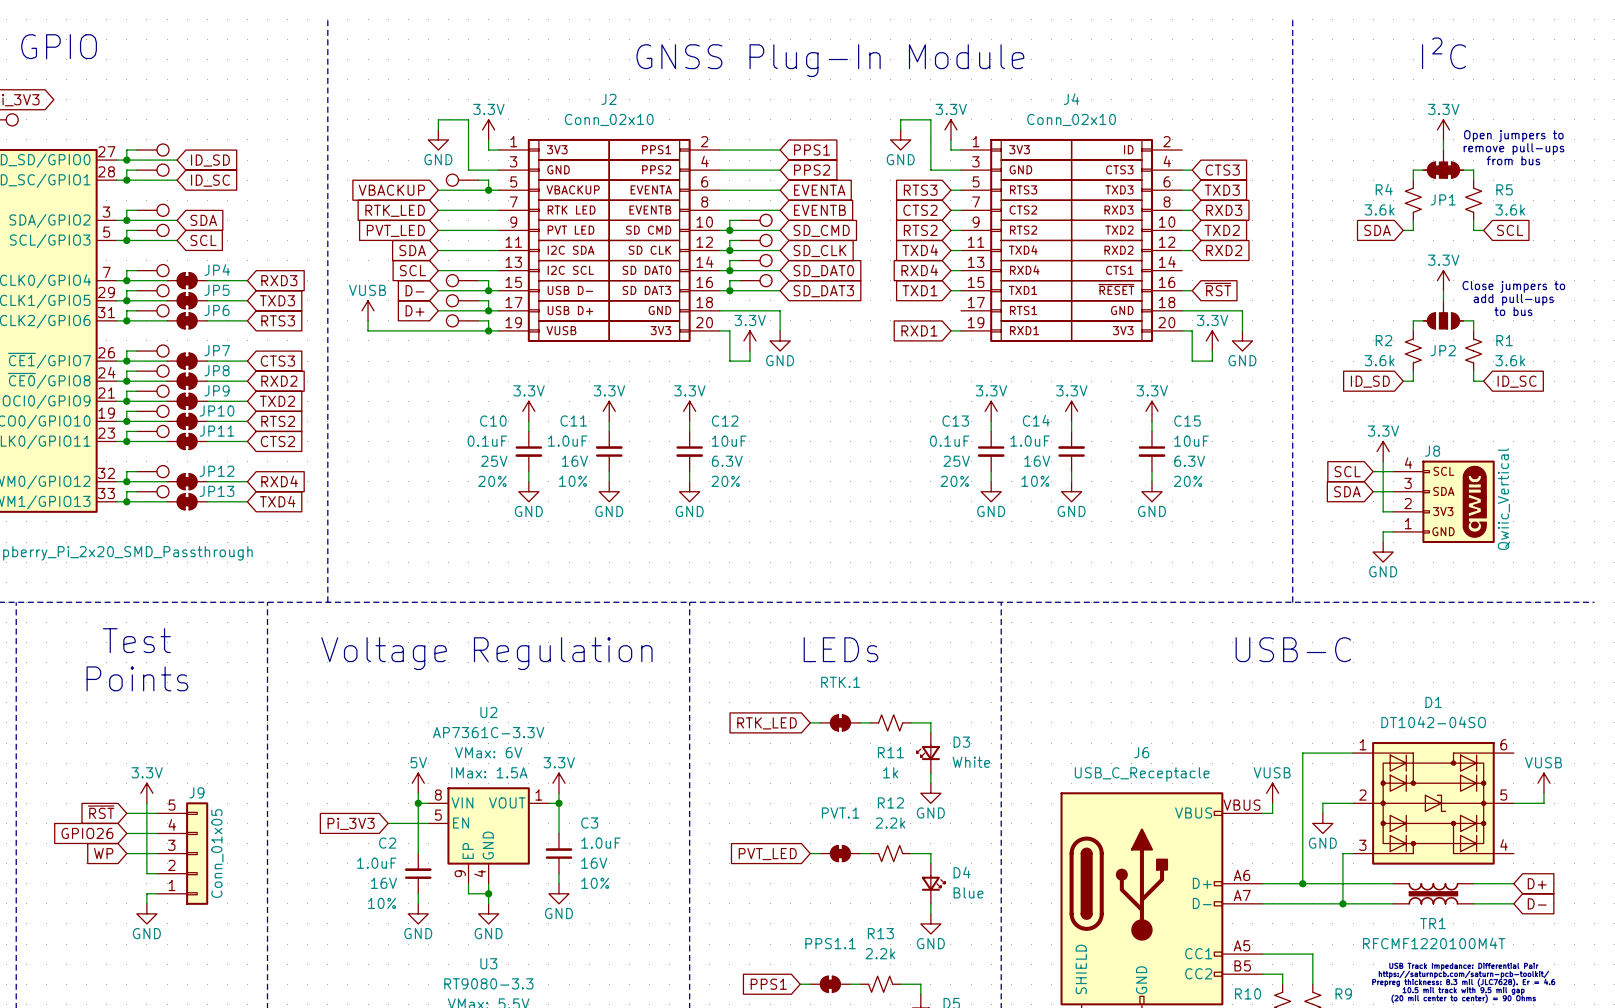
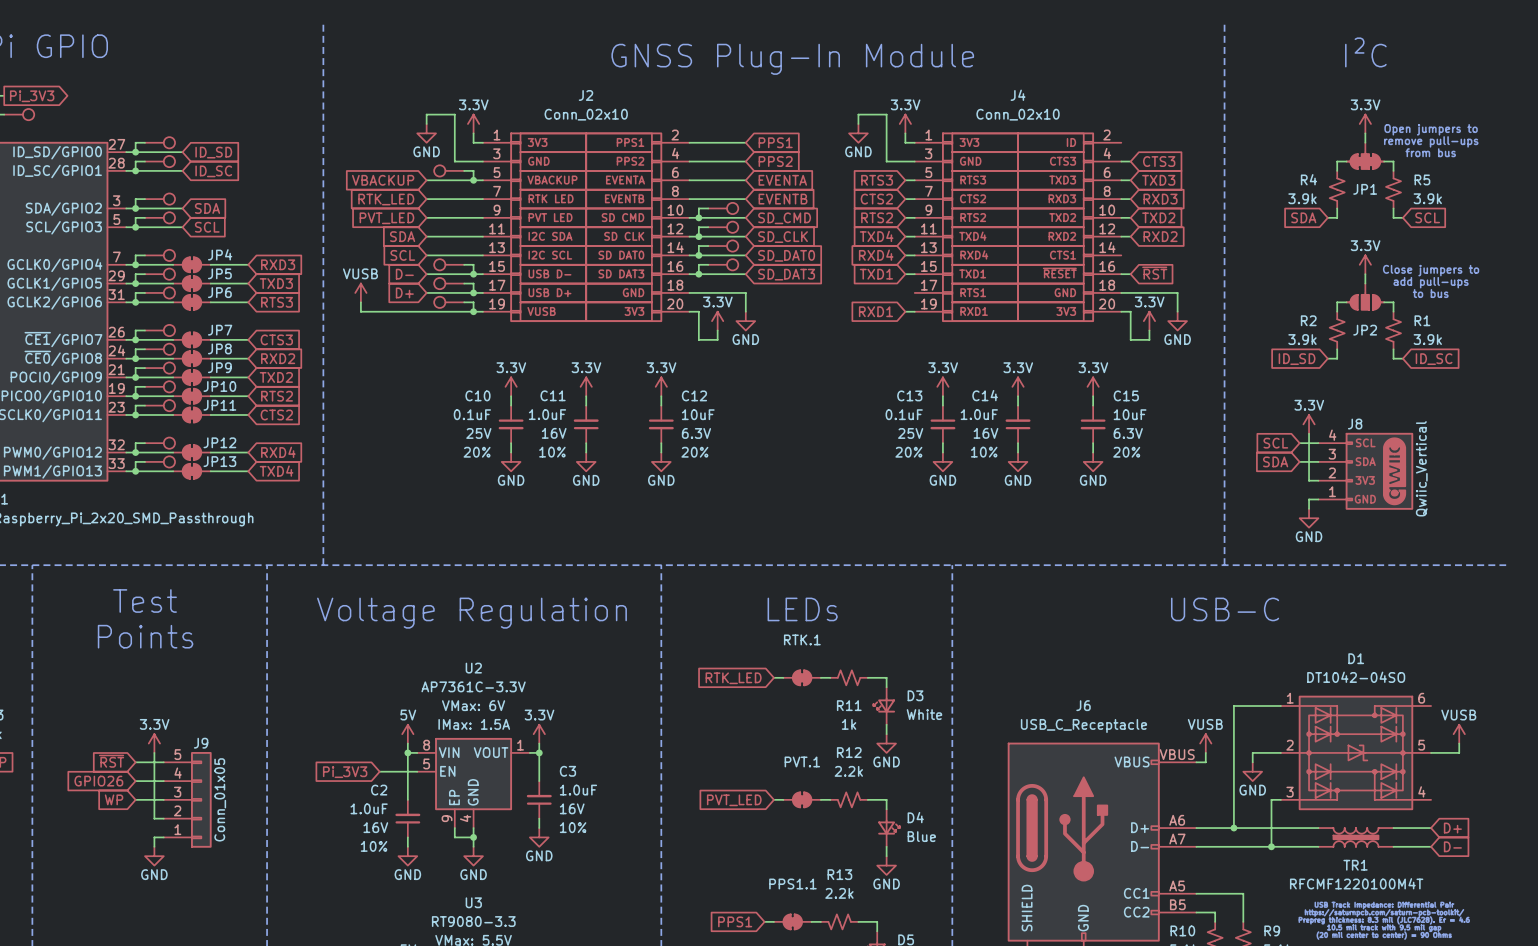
R4 flip: as is (1413, 200) -> left-right (1337, 189)
R4 value: 3.6k (1379, 209) -> 3.9k (1302, 198)
R5 value: 3.6k (1510, 209) -> 3.9k (1427, 198)
R2 flip: as is (1413, 351) -> left-right (1337, 330)
R2 value: 3.6k (1379, 360) -> 3.9k (1302, 339)
R1 value: 3.6k (1510, 360) -> 3.9k (1427, 339)

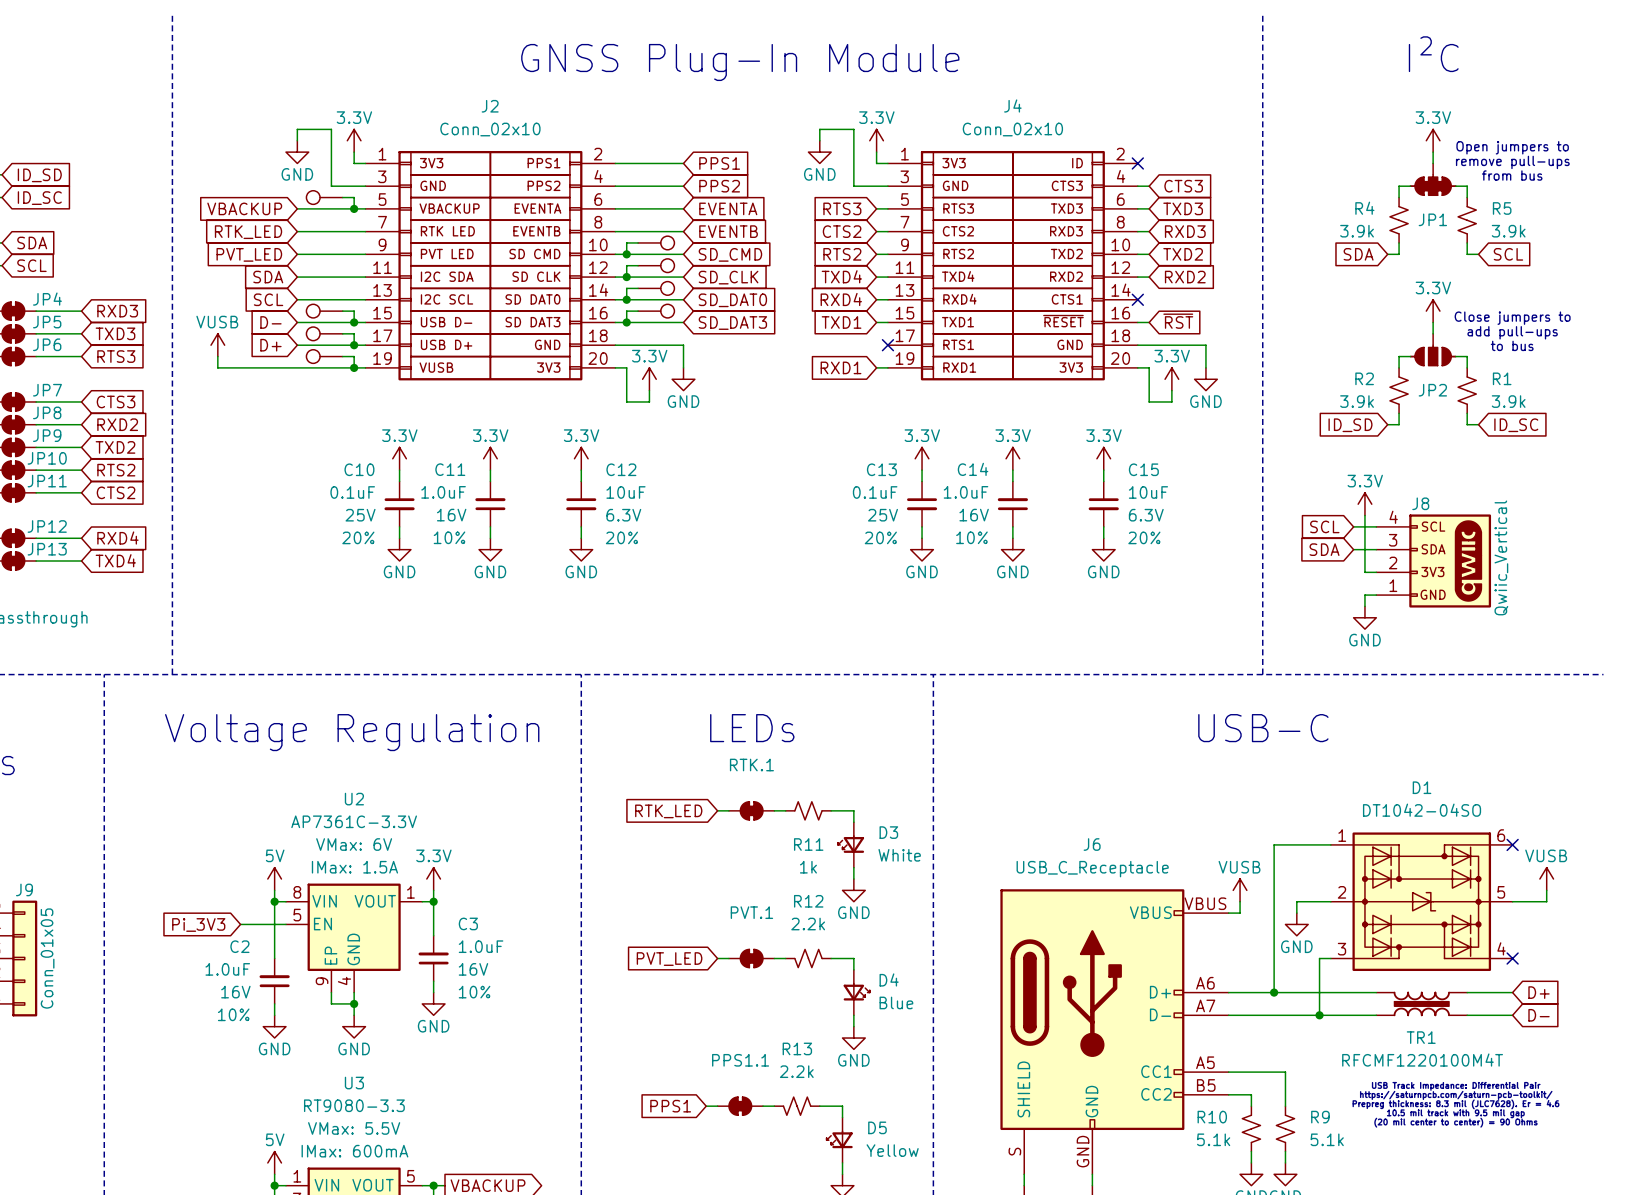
no-connect mark: none -> (1137, 163)
no-connect mark: none -> (1137, 299)
no-connect mark: none -> (887, 345)
no-connect mark: none -> (1512, 844)
no-connect mark: none -> (1512, 958)

